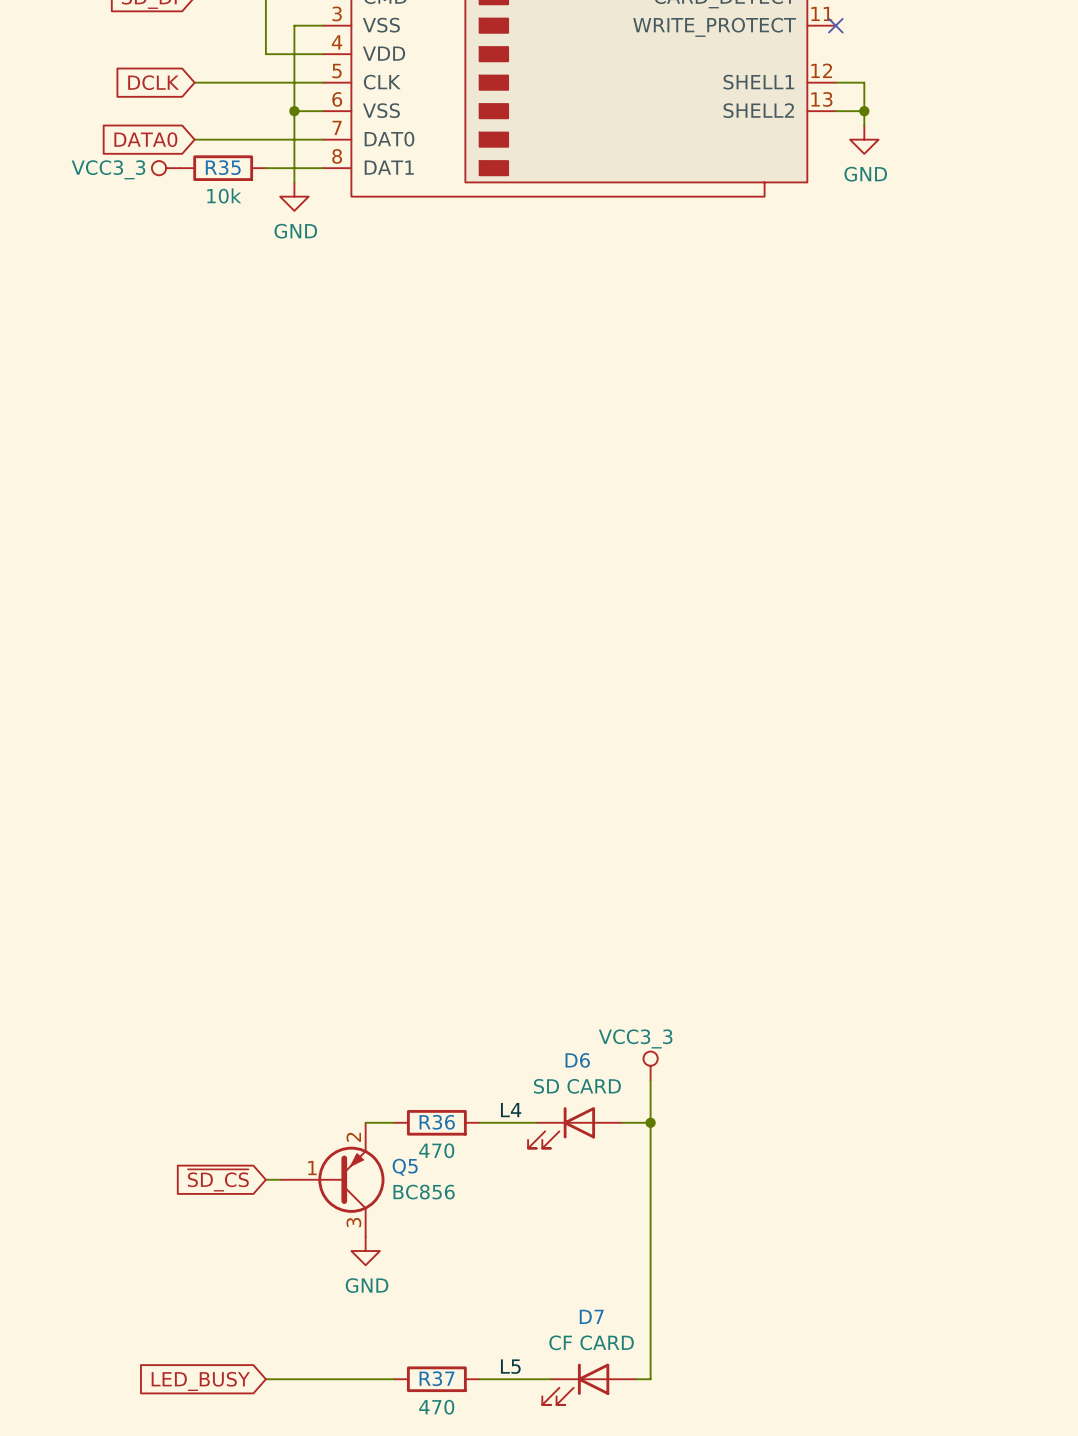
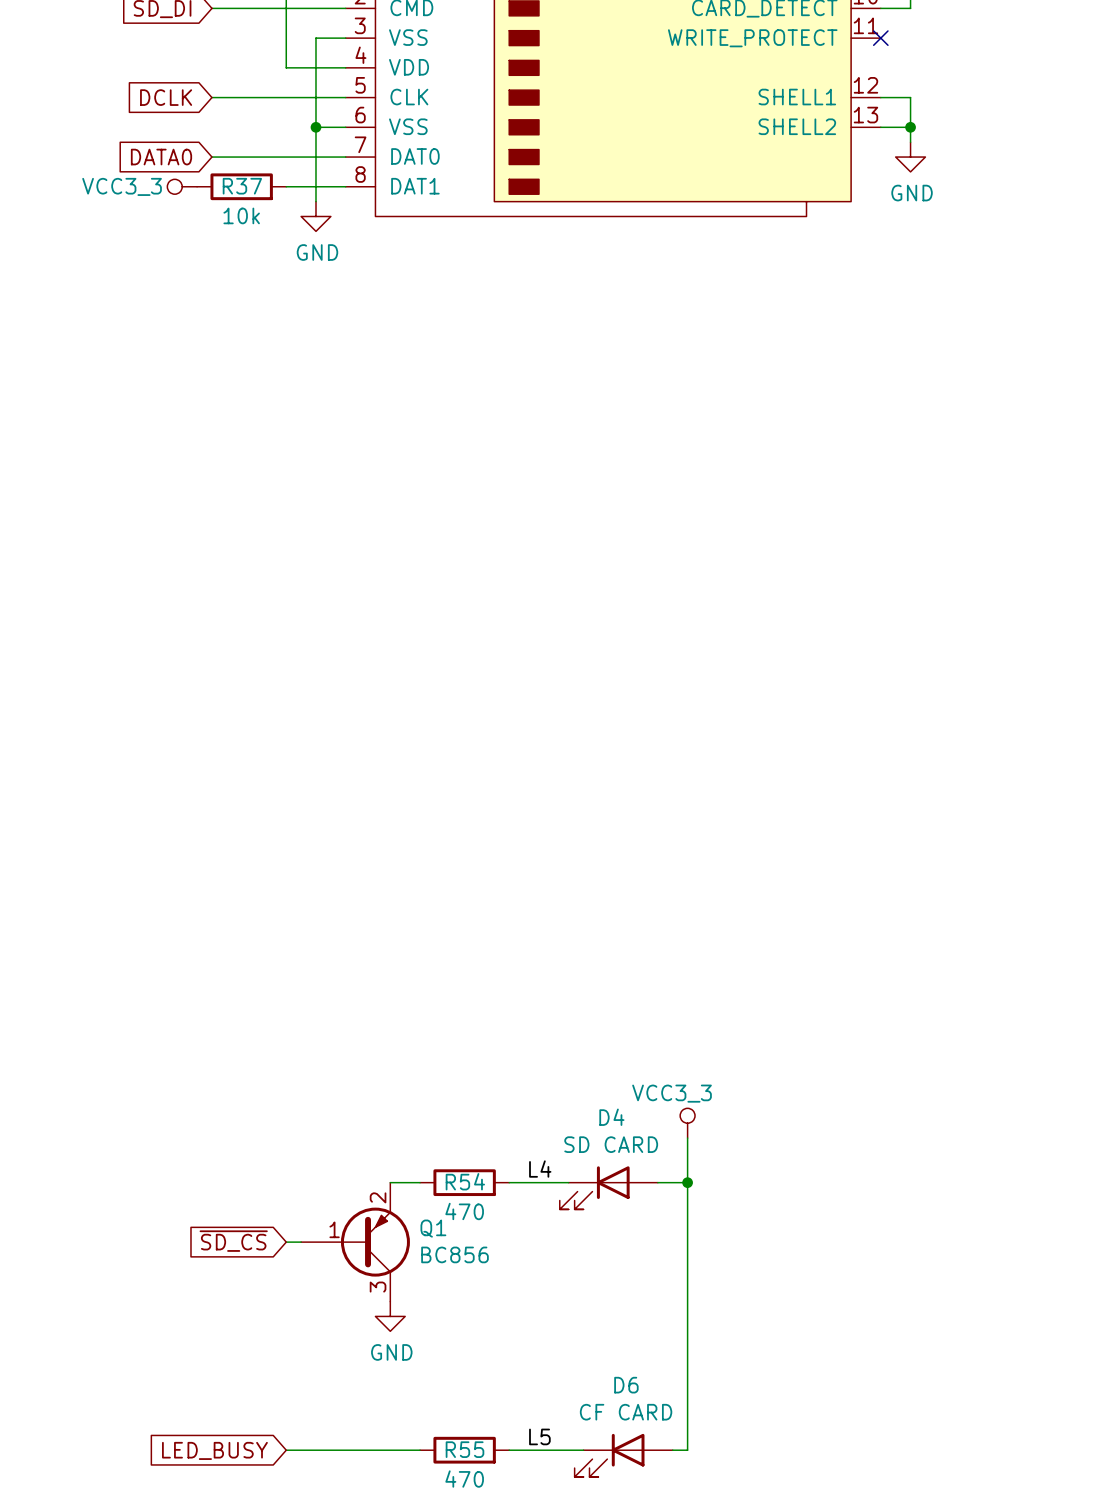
R35 name: R35 (223, 167) -> R37 (242, 186)
D6 name: D6 (577, 1060) -> D4 (611, 1117)
R36 name: R36 (437, 1122) -> R54 (465, 1181)
Q5 name: Q5 (405, 1167) -> Q1 (433, 1228)
D7 name: D7 (591, 1316) -> D6 (626, 1385)
R37 name: R37 (437, 1378) -> R55 (464, 1449)

